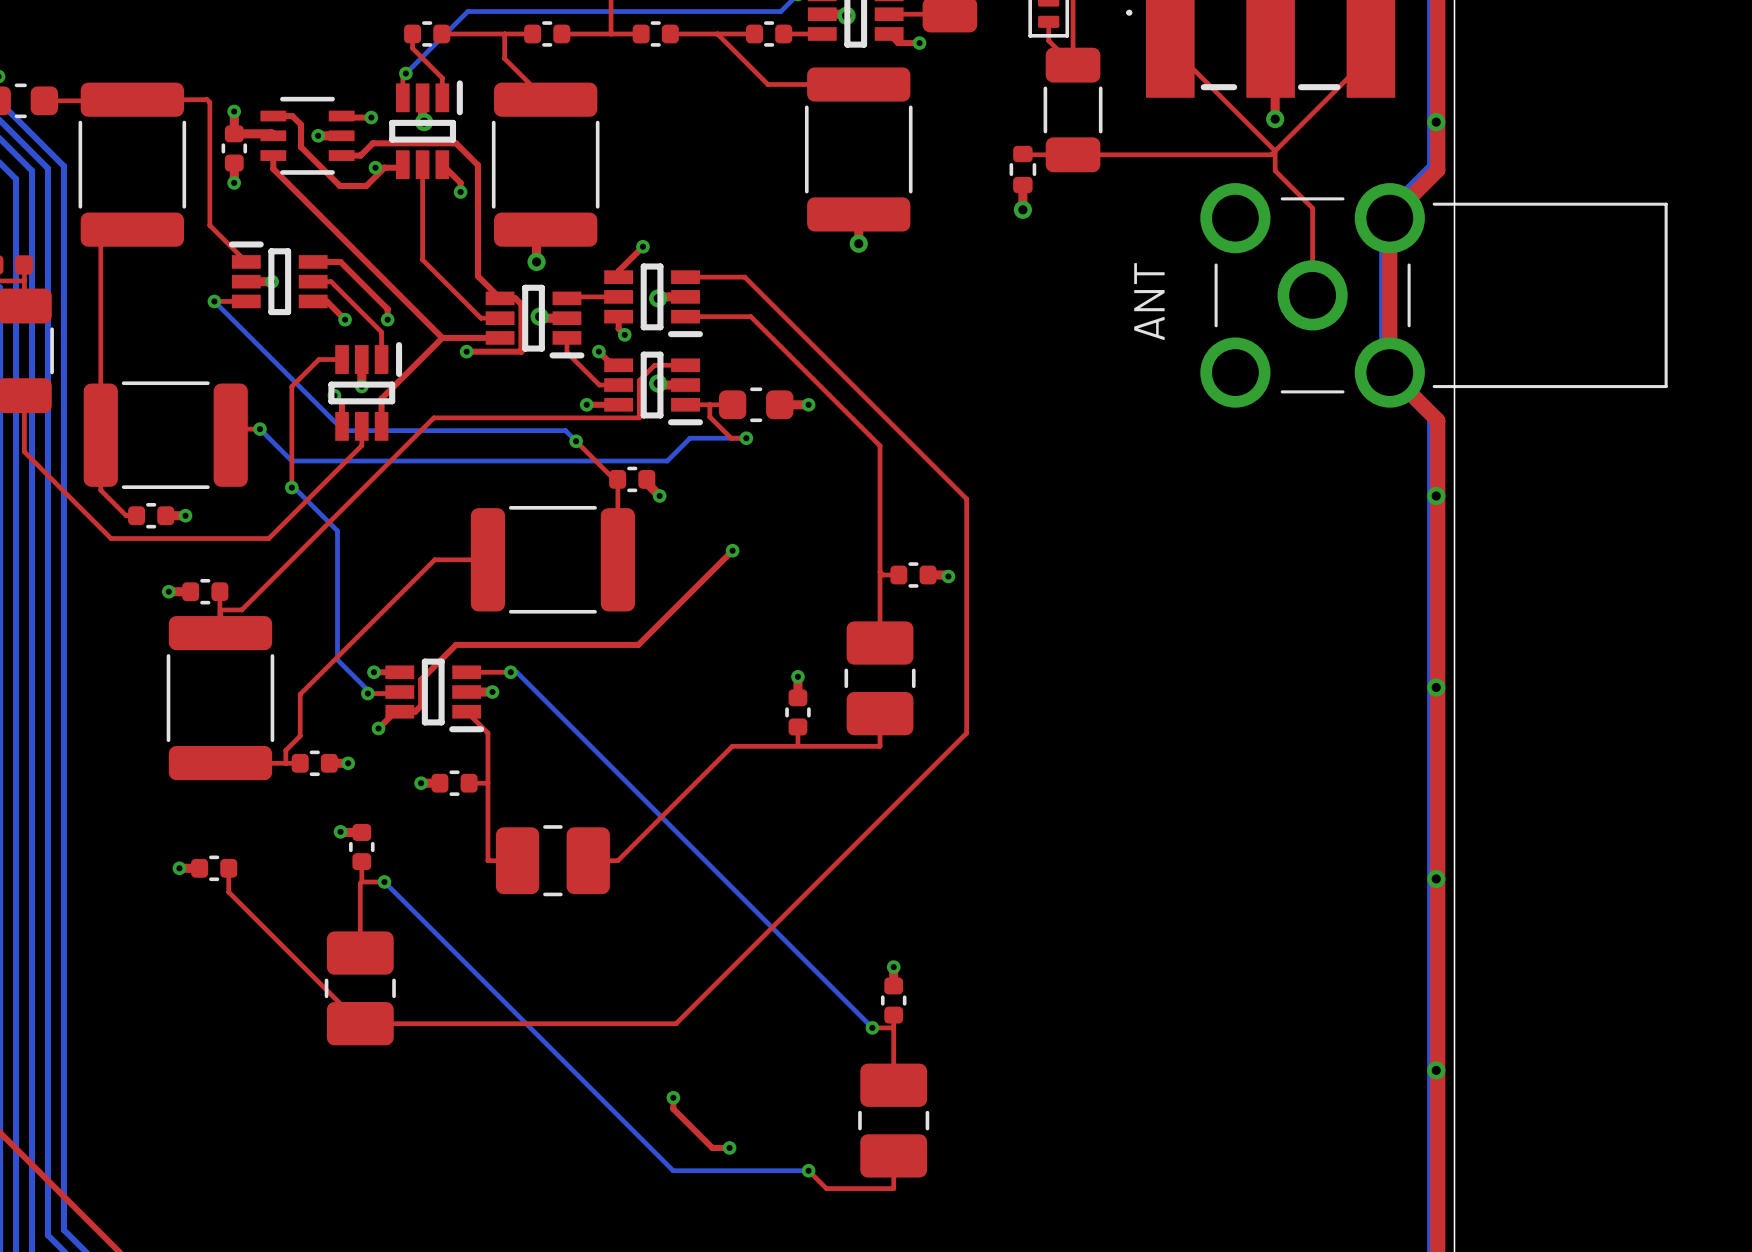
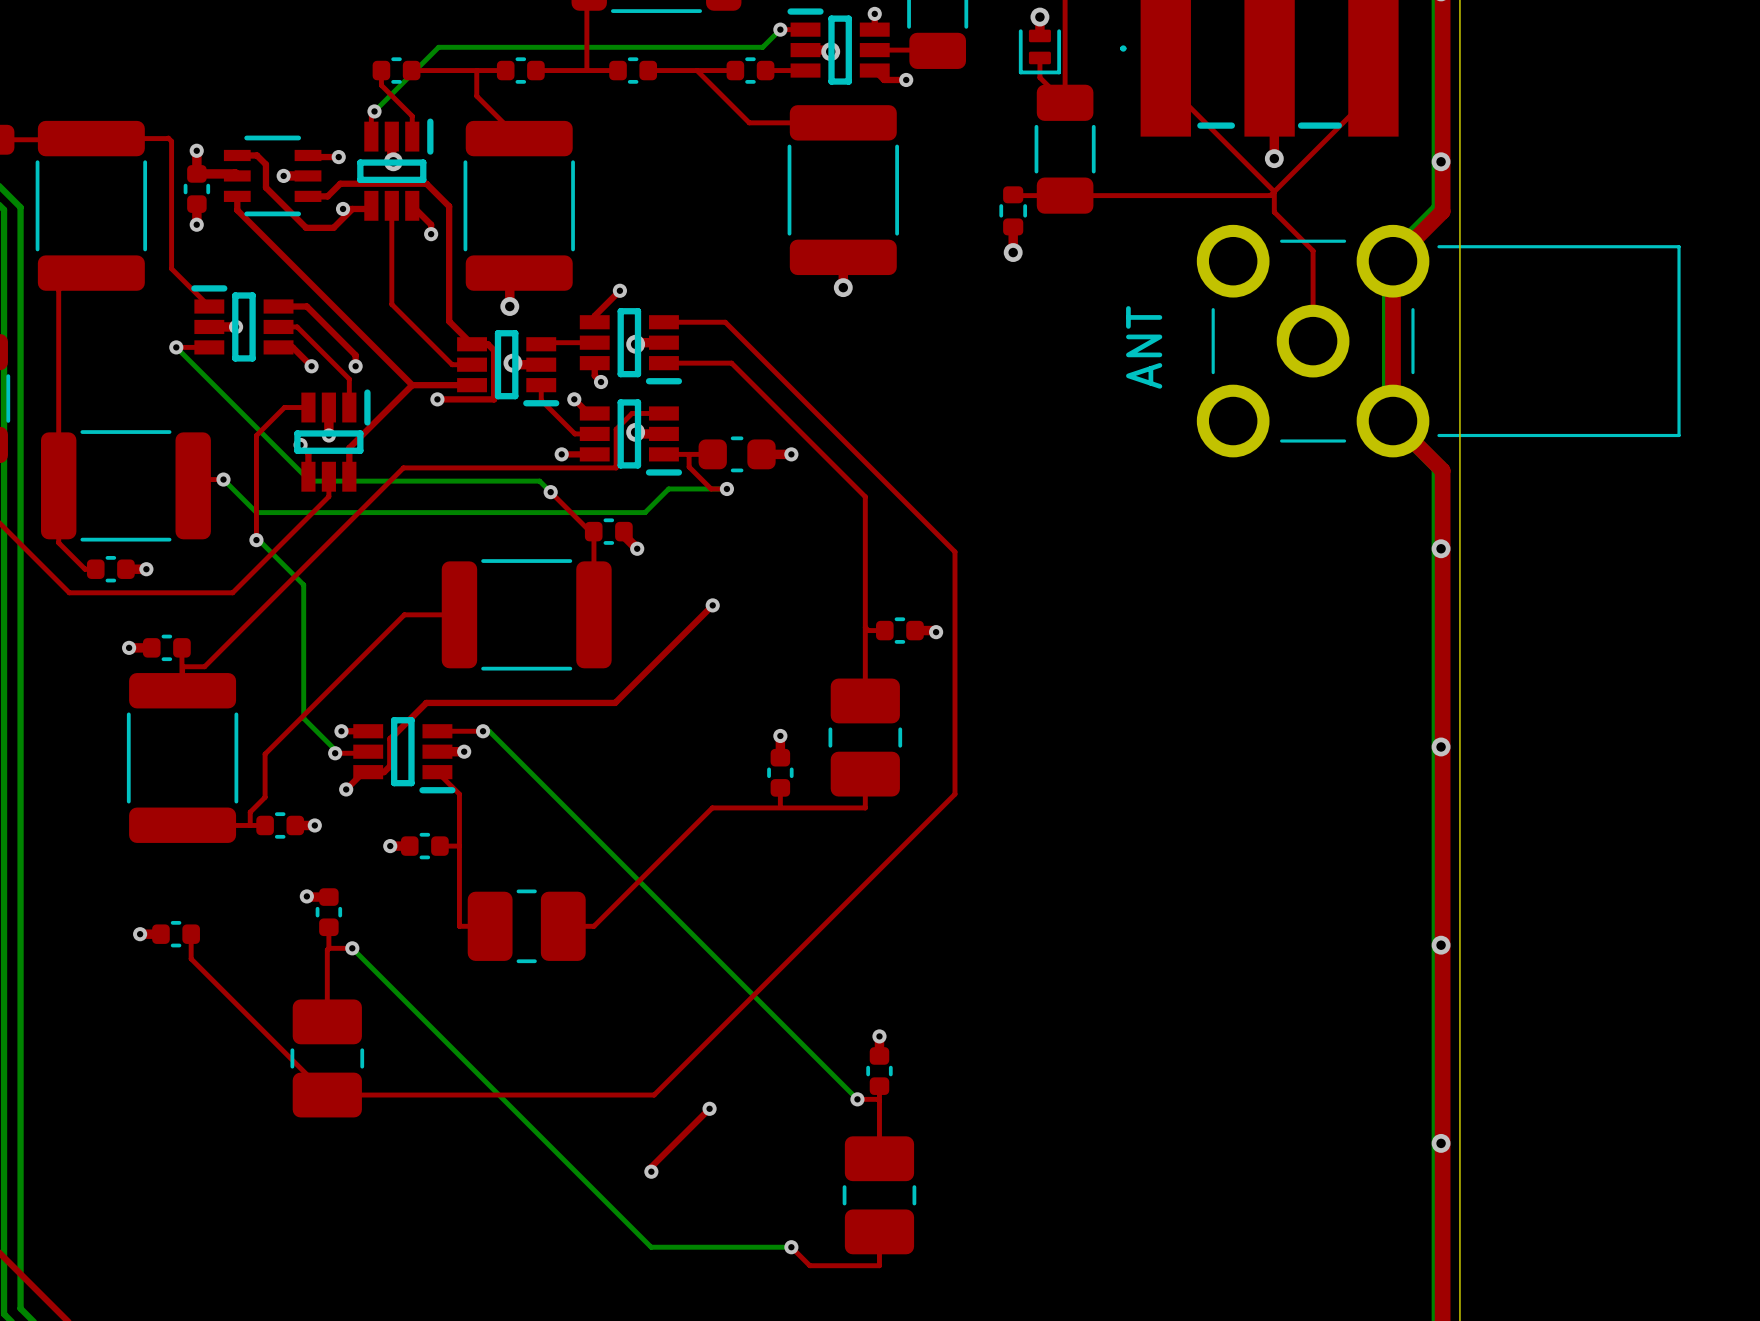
top track: (673, 1097) (673, 1108) (712, 1147) (729, 1147) -> (651, 1171) (651, 1167) (709, 1108)
via position: (729, 1147) -> (709, 1108)

